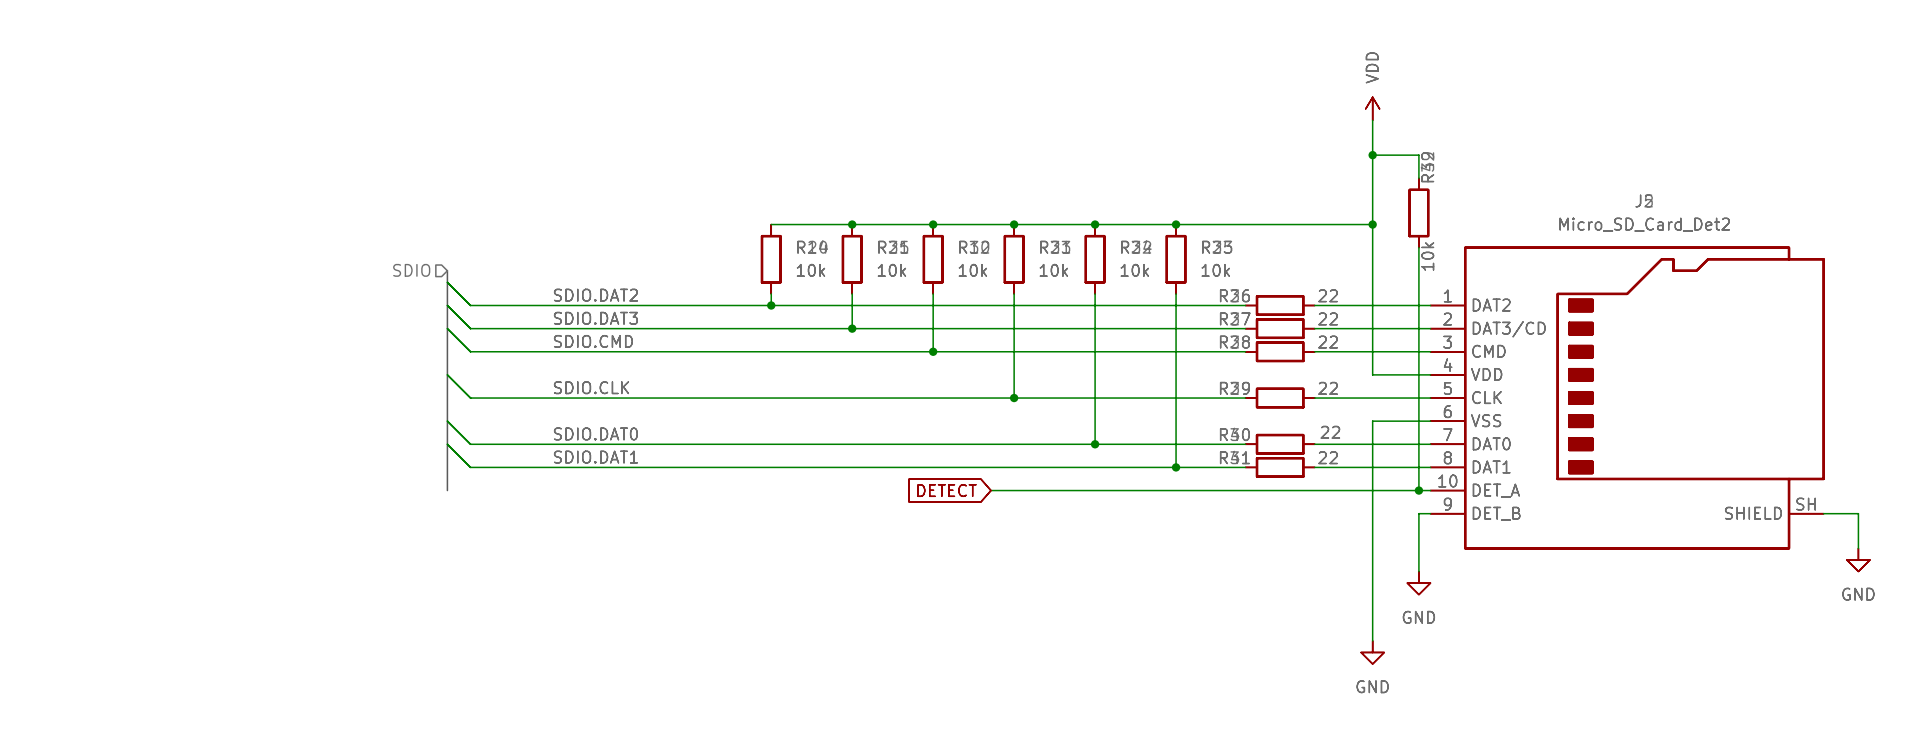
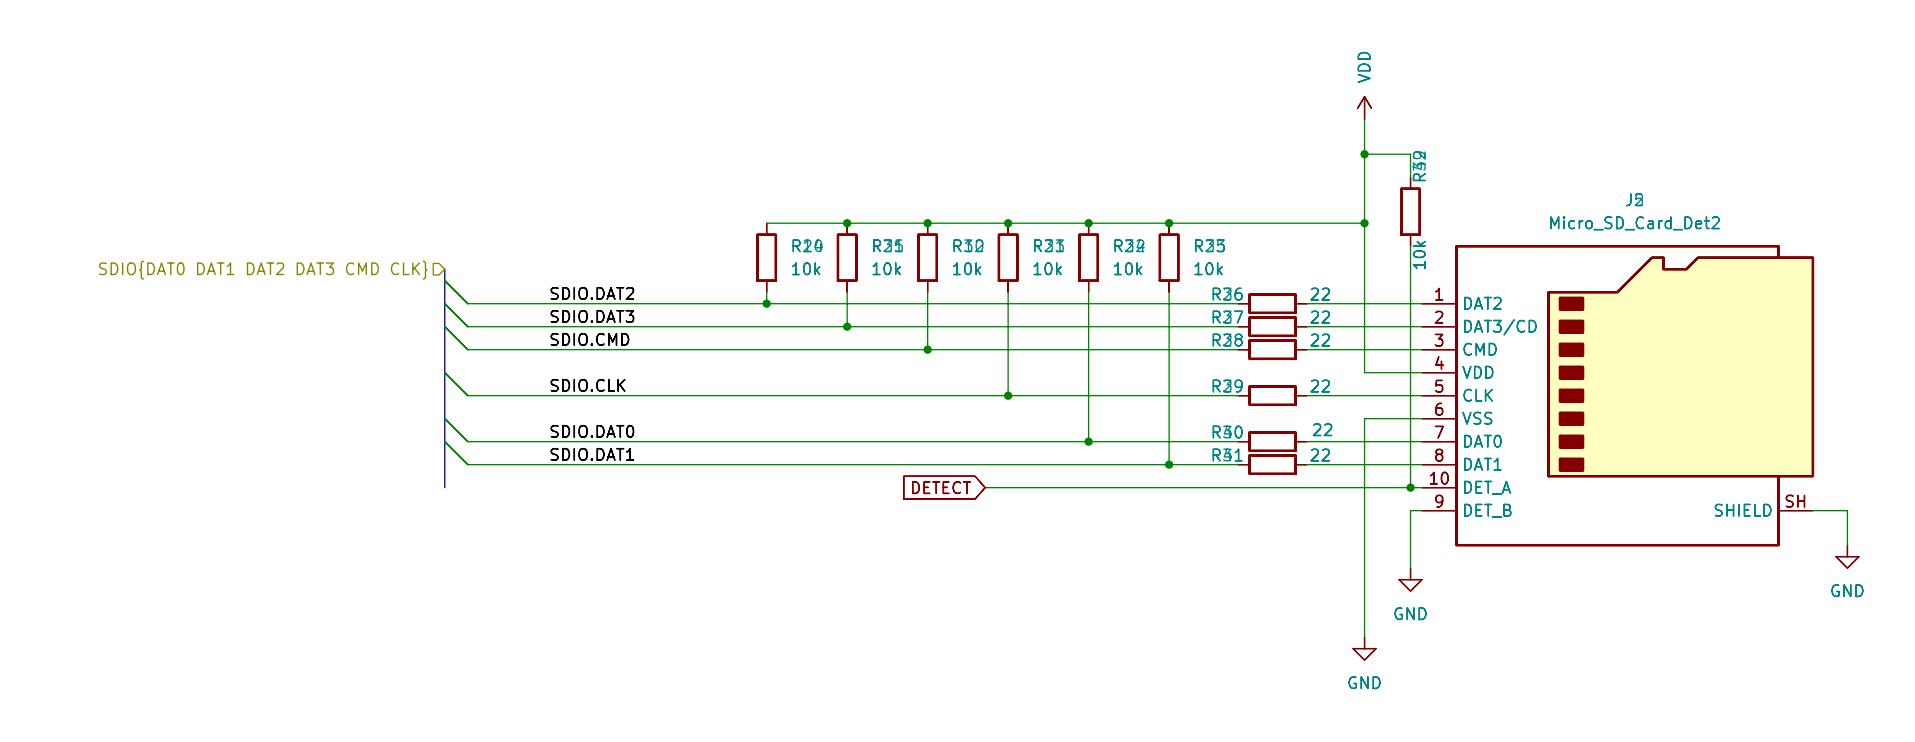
hierarchical label: SDIO (411, 270) -> SDIO{DAT0 DAT1 DAT2 DAT3 CMD CLK} (263, 270)

